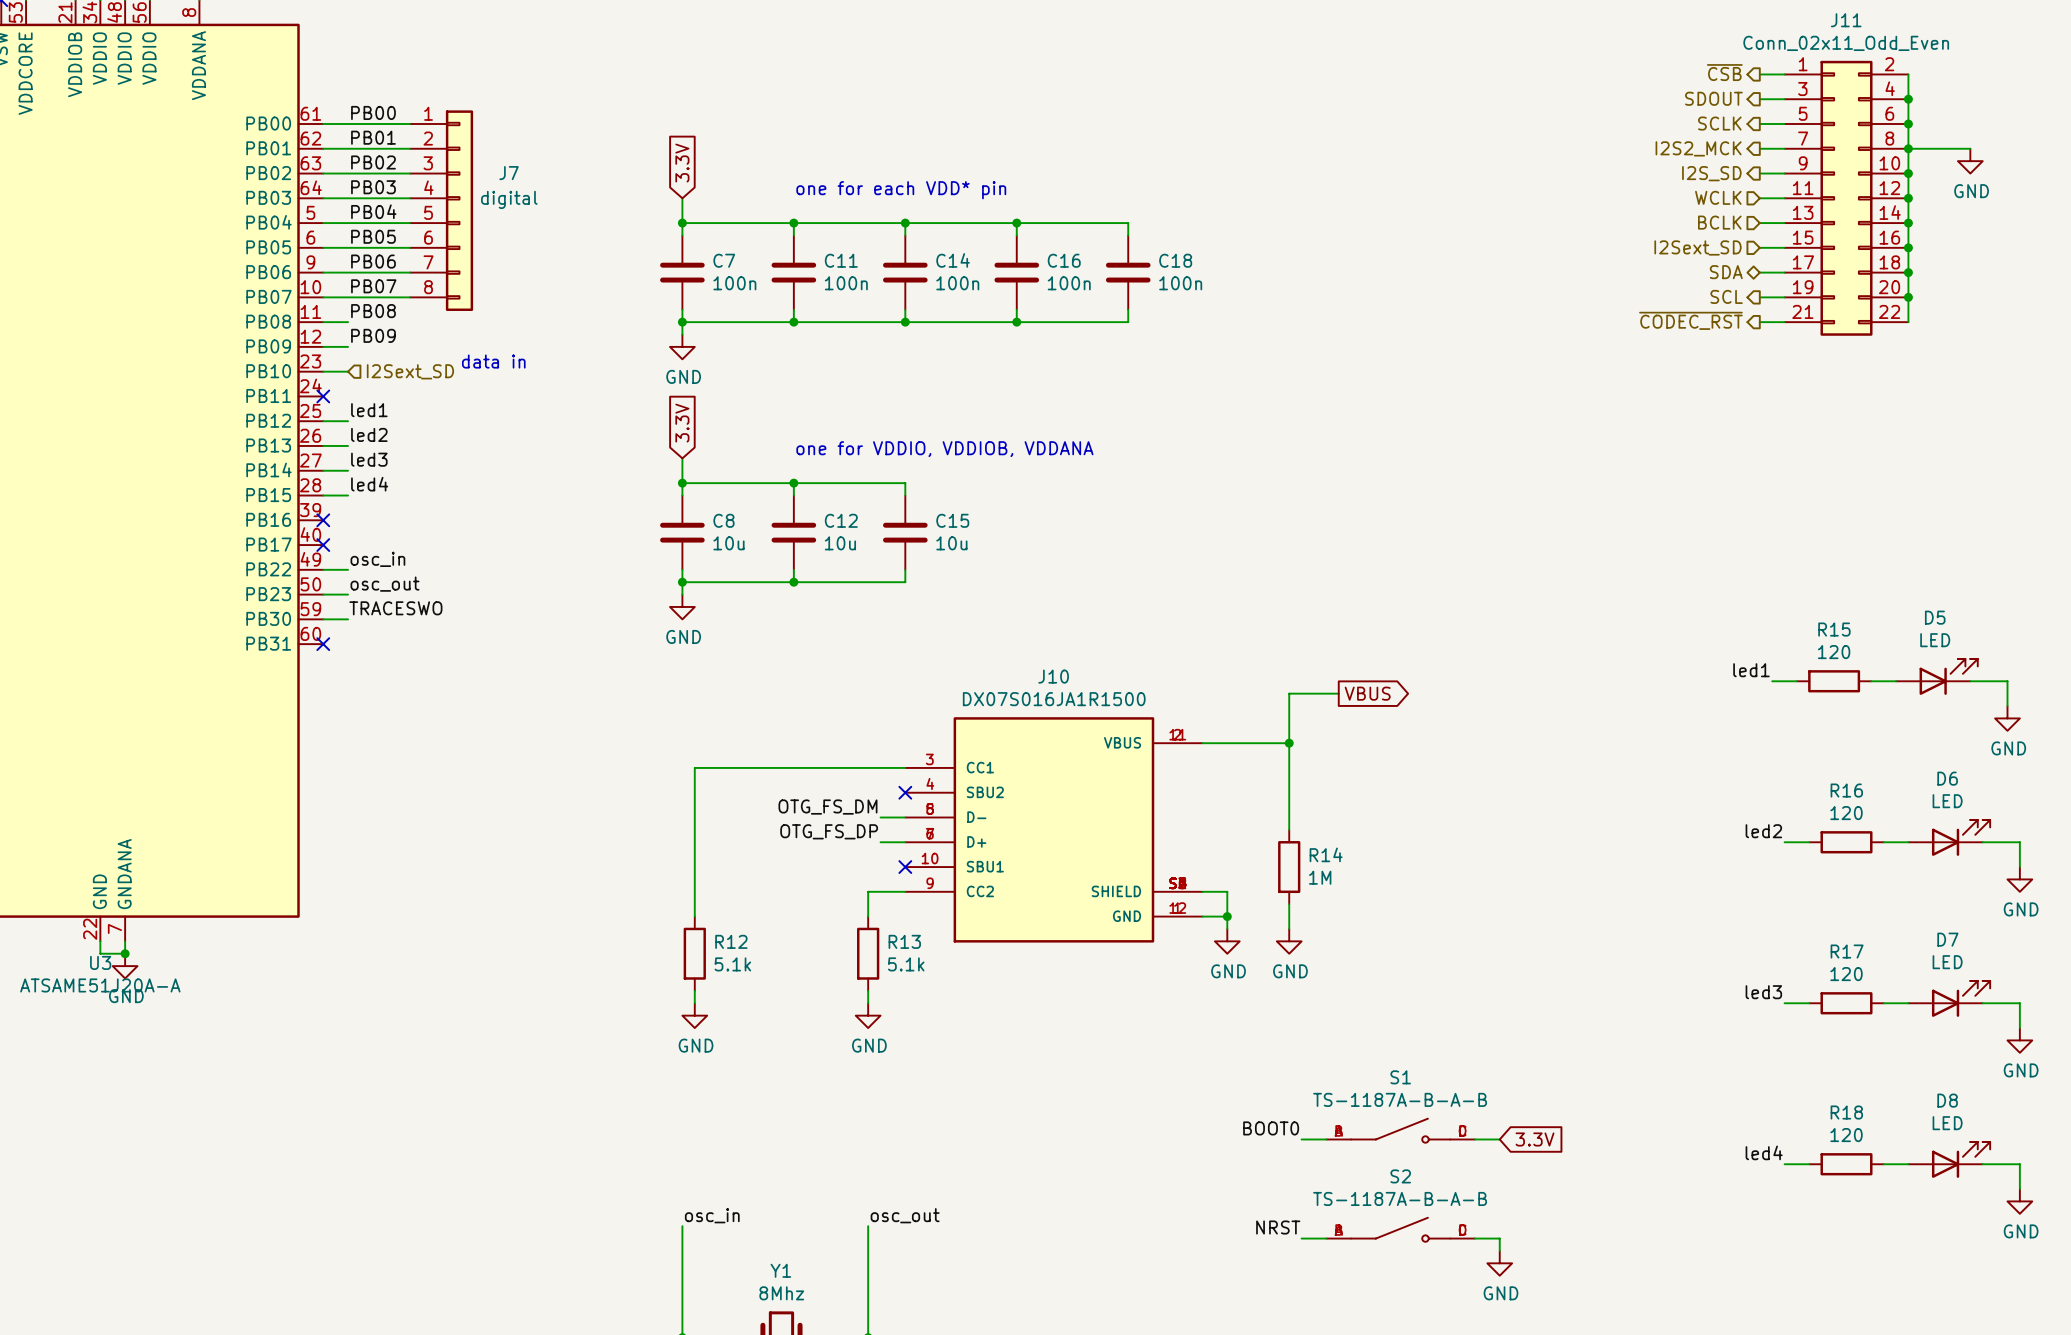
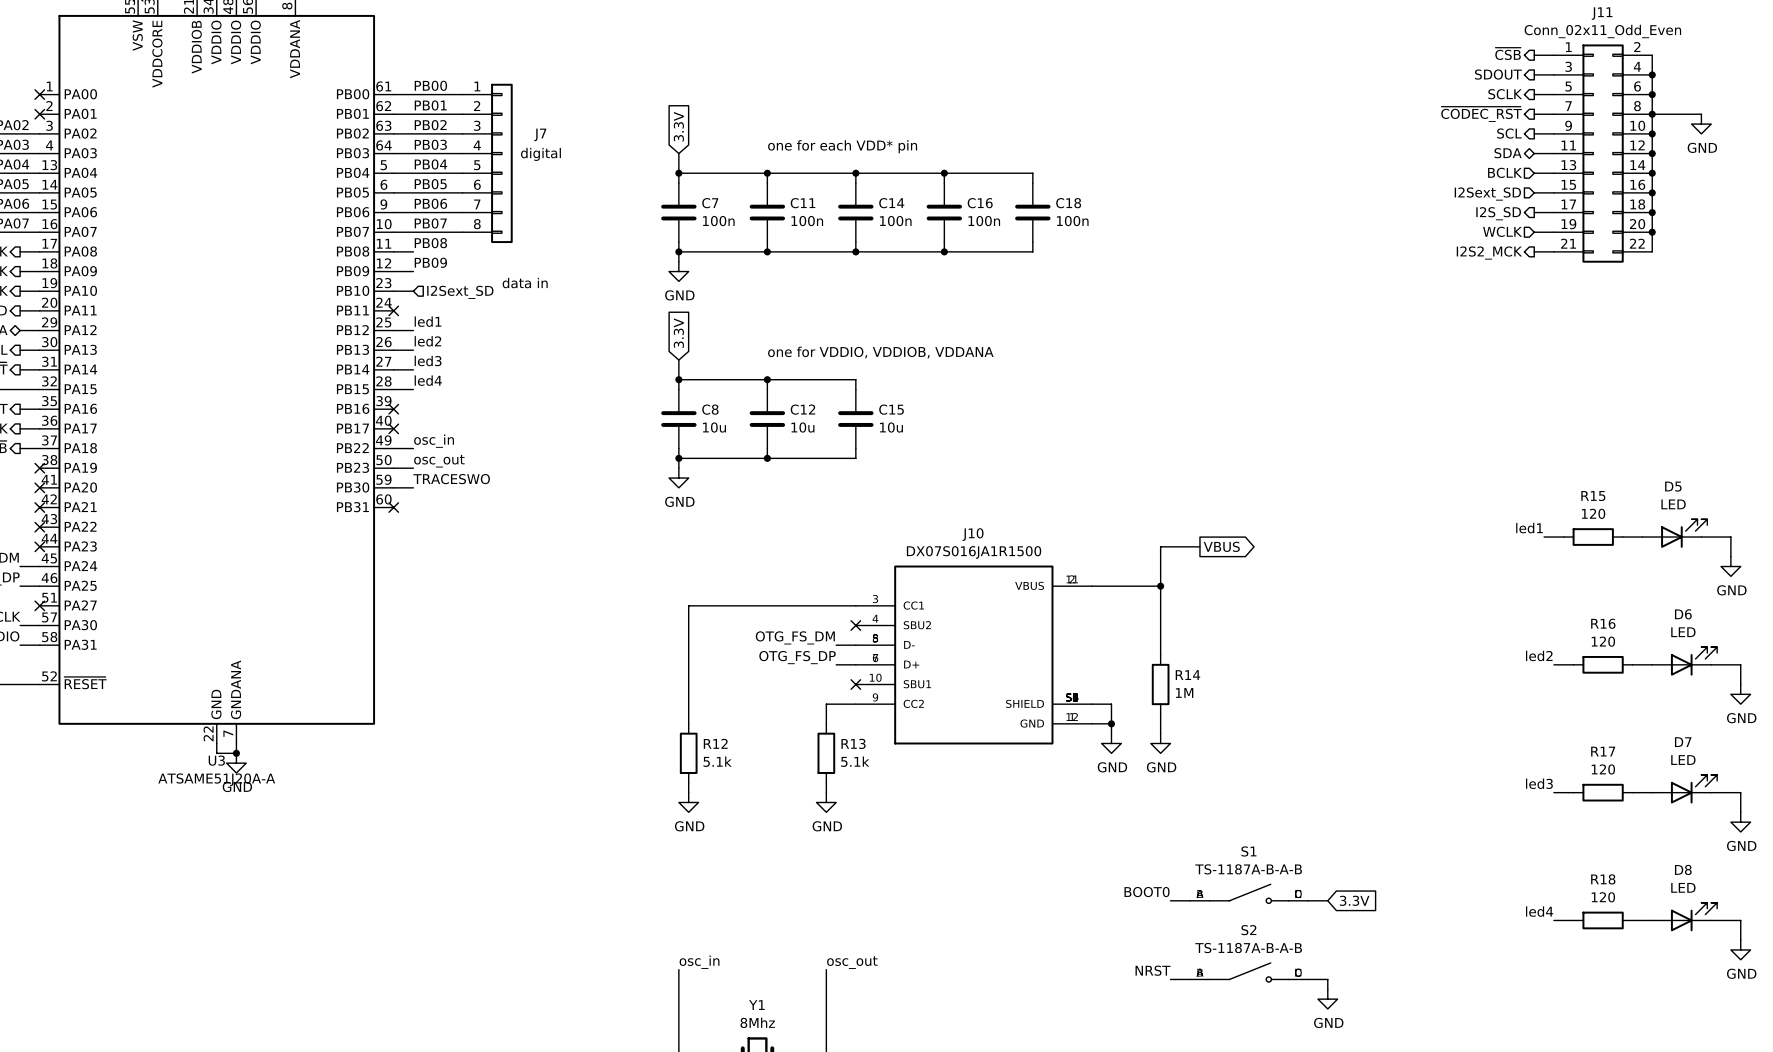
hierarchical label: I2S2_MCK (1698, 148) -> ~{CODEC_RST} (1481, 114)
hierarchical label: I2S_SD (1711, 173) -> SCL (1509, 133)
hierarchical label shape: input (1718, 197) -> bidirectional (1508, 153)
hierarchical label: WCLK (1718, 197) -> SDA (1508, 153)
hierarchical label shape: bidirectional (1726, 272) -> output (1498, 213)
hierarchical label: SDA (1726, 272) -> I2S_SD (1498, 213)
hierarchical label shape: output (1726, 296) -> input (1502, 231)
hierarchical label: SCL (1726, 296) -> WCLK (1502, 231)
hierarchical label: ~{CODEC_RST} (1690, 320) -> I2S2_MCK (1489, 253)

